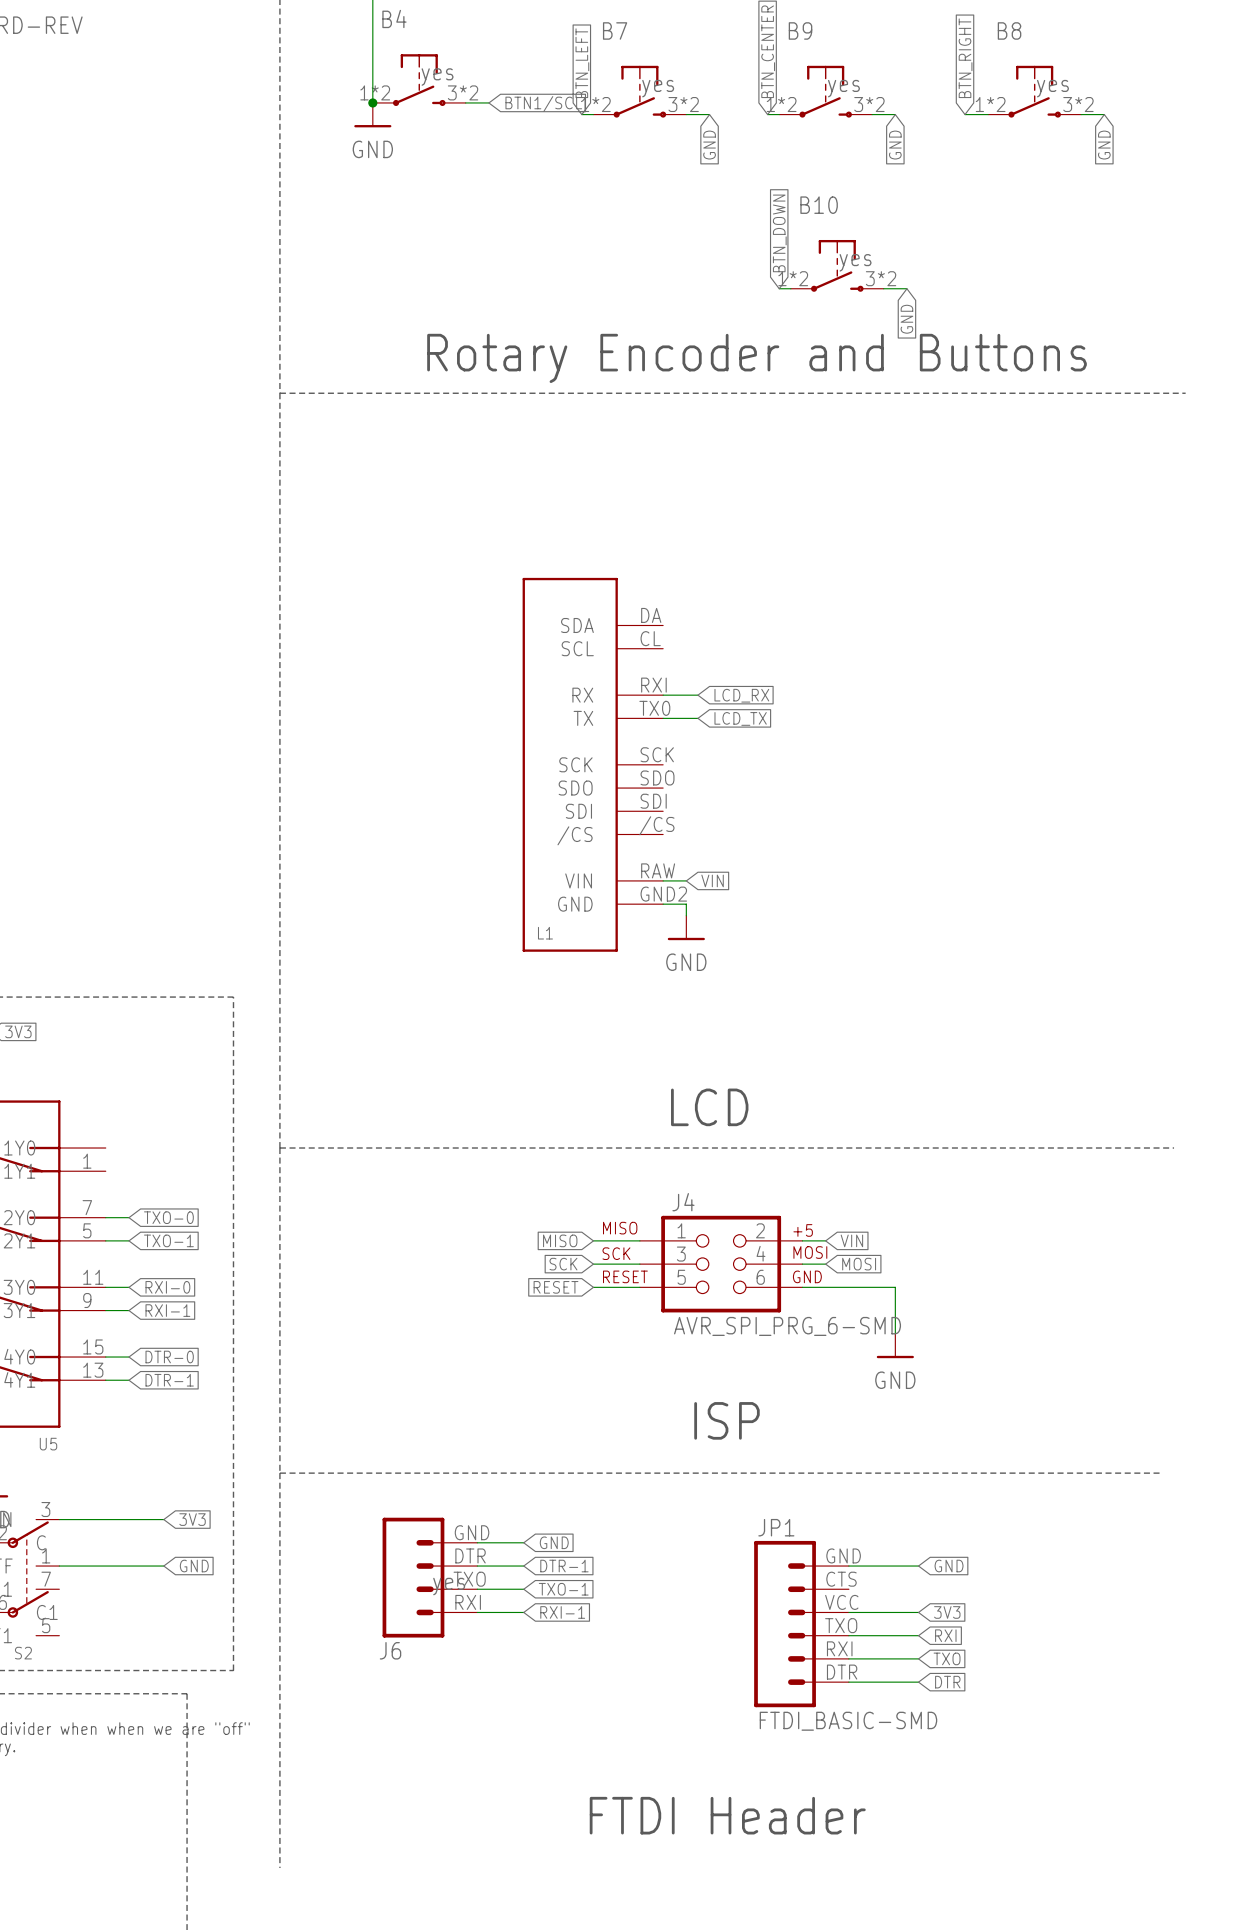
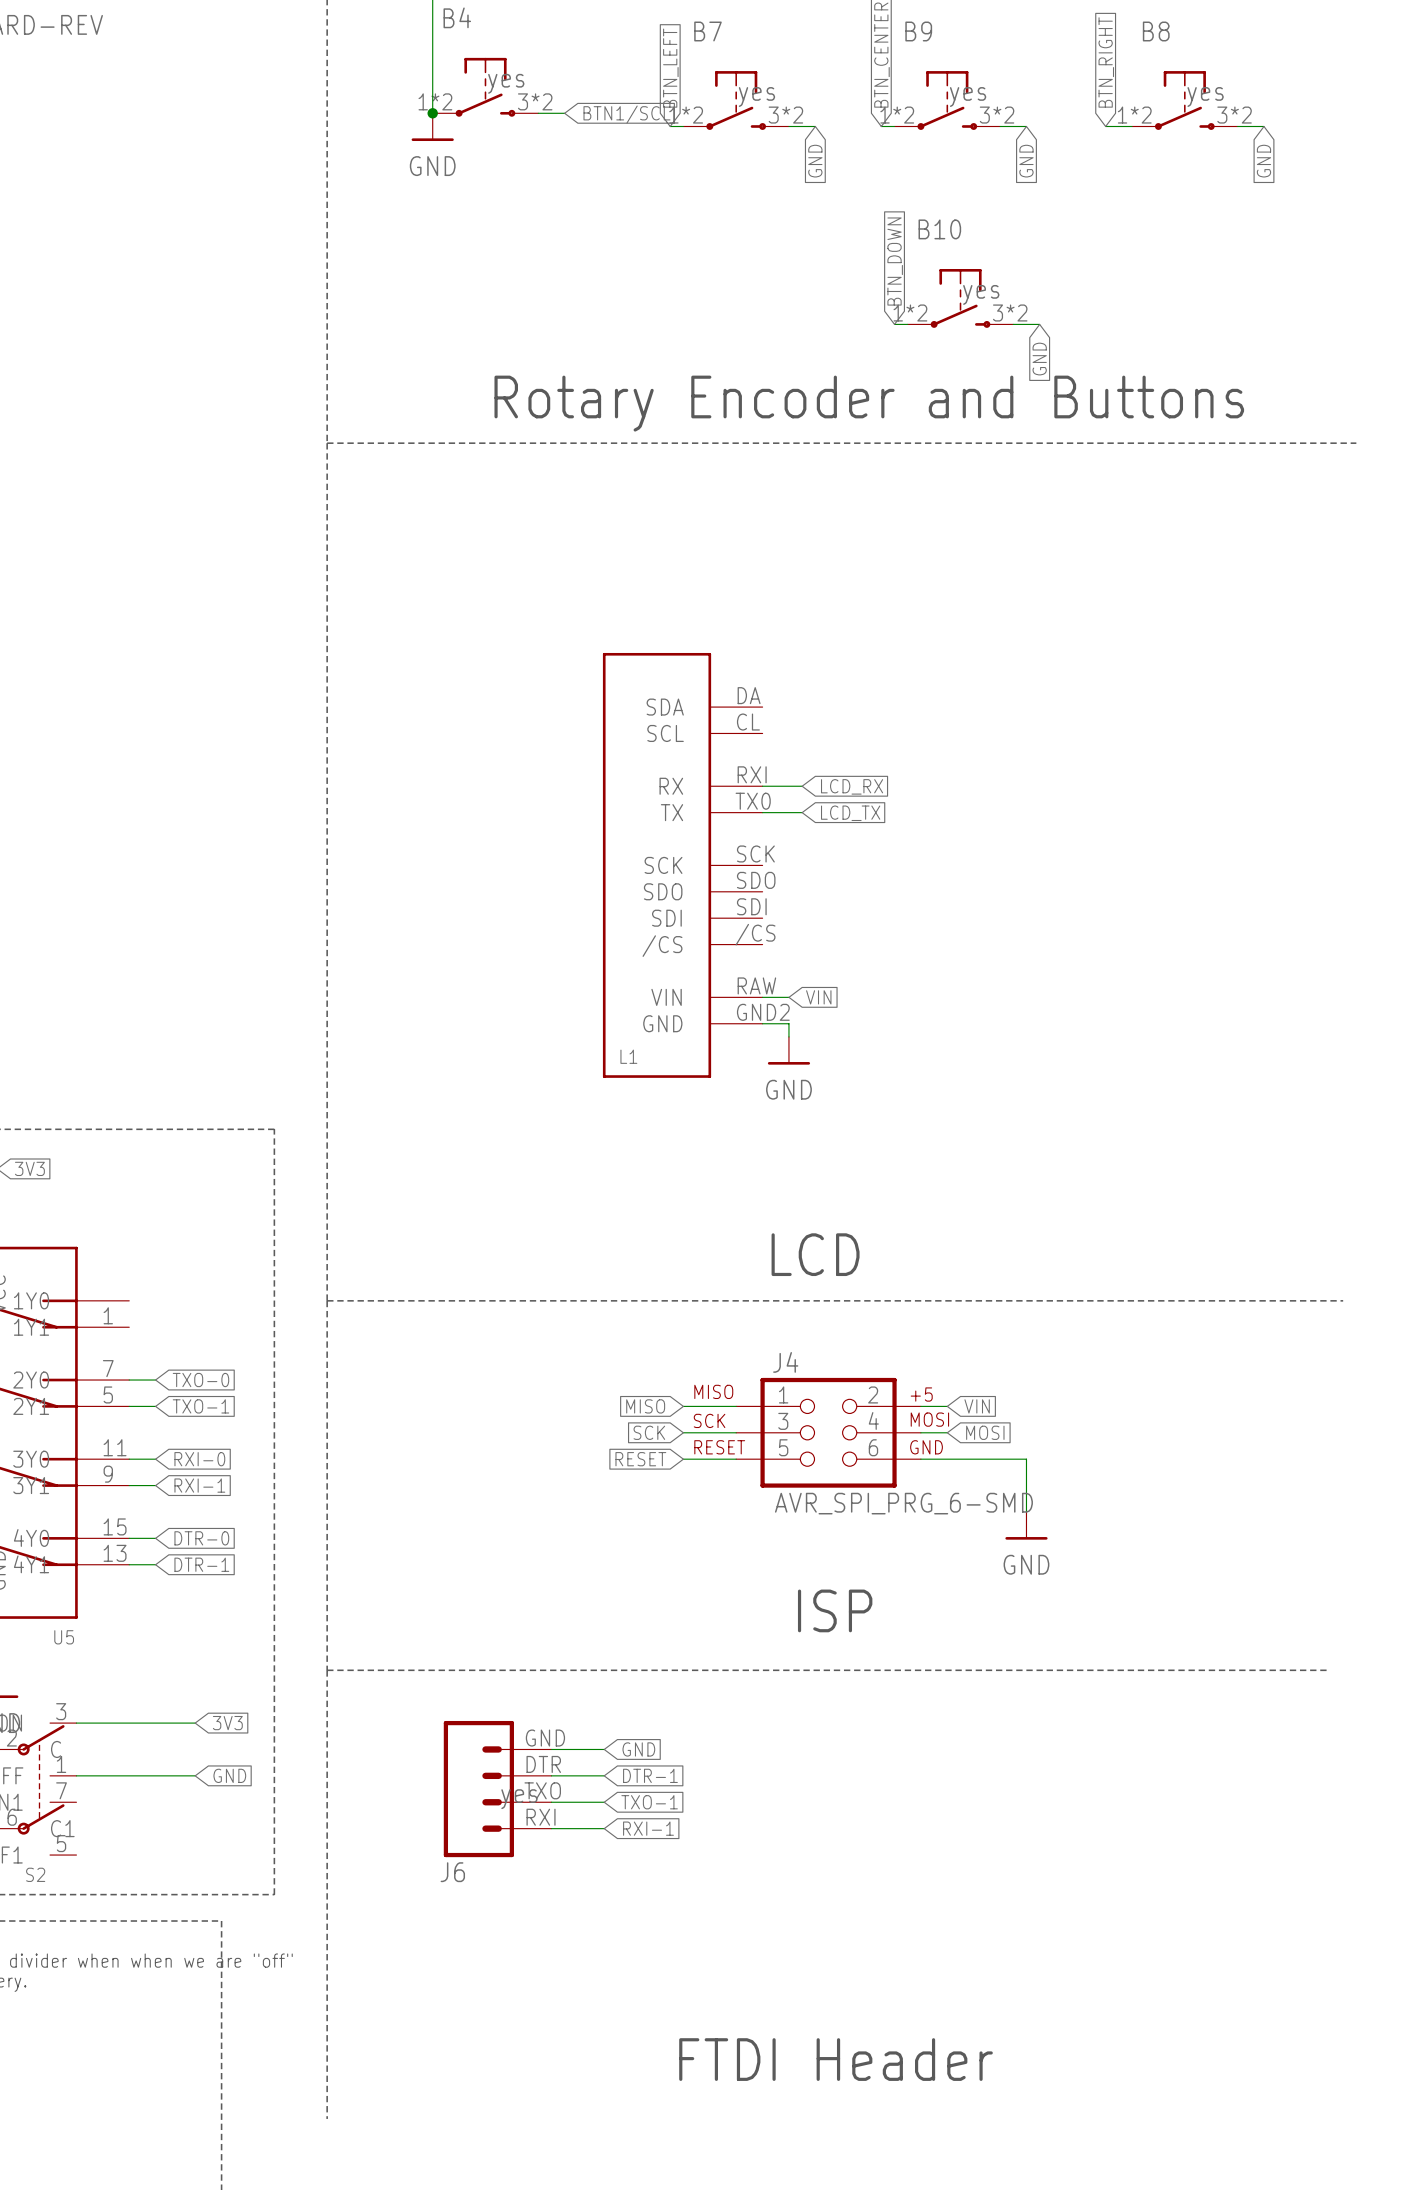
wire: (848, 1566) (918, 1566) -> none
global label: GND (949, 1566) -> none
wire: (848, 1612) (918, 1612) -> none
global label: 3V3 (947, 1612) -> none
JP1: FTDI_BASIC-SMD (801, 1624) -> none
wire: (848, 1635) (918, 1635) -> none
global label: RXI (945, 1635) -> none
wire: (848, 1658) (918, 1658) -> none
global label: TXO (947, 1658) -> none
wire: (848, 1682) (918, 1682) -> none
global label: DTR (947, 1682) -> none

